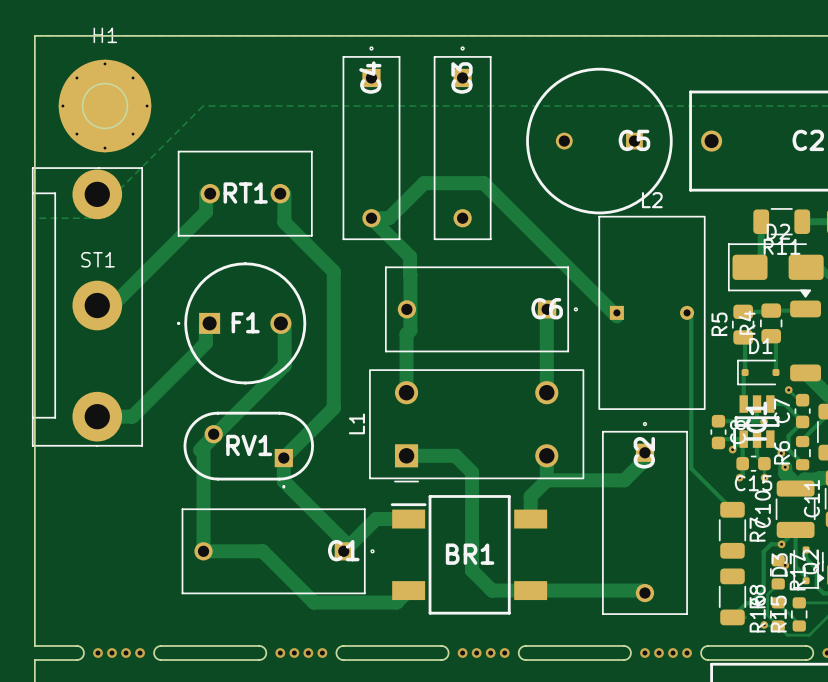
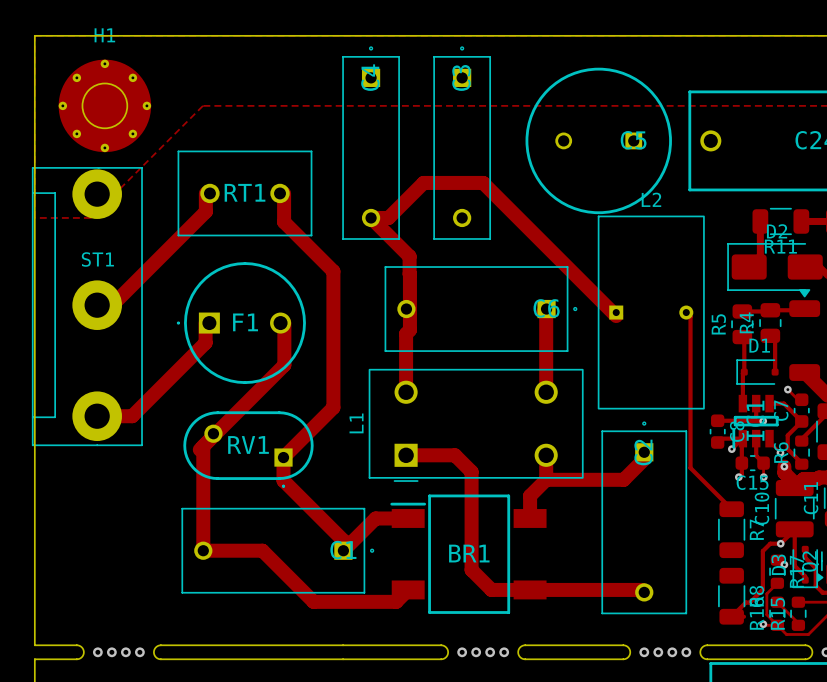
board edge: (259, 645) (264, 648) (266, 653) (264, 657) (259, 660) -> (258, 645) (343, 645)
board edge: (343, 645) (338, 648) (336, 653) (338, 657) (343, 660) -> (258, 659) (343, 659)
via: (280, 653) -> none
via: (294, 653) -> none
via: (308, 653) -> none
via: (322, 653) -> none

